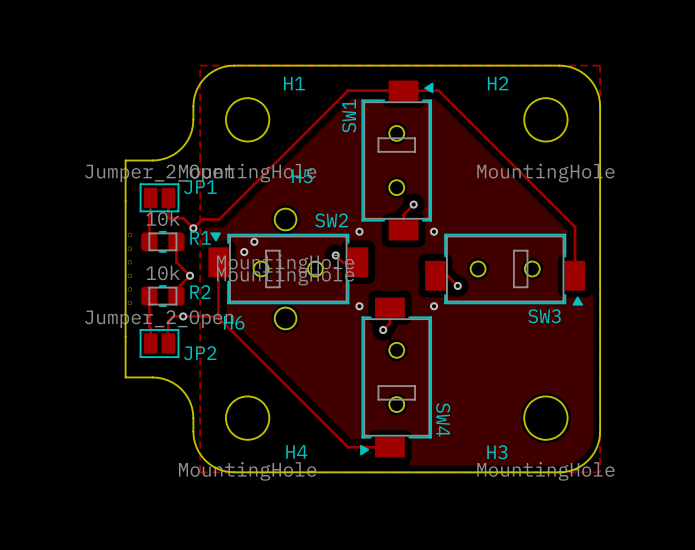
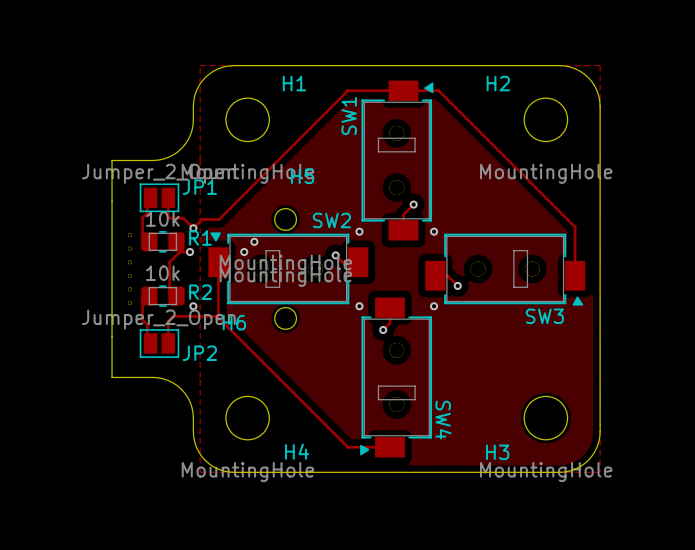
SW1 footprint: [361, 80, 434, 241] -> [361, 80, 434, 241]
board edge: (125, 160) (125, 377) -> (125, 160) (112, 160) (112, 377) (125, 377)
track: none -> (147, 197) (147, 213) (142, 218) (142, 241)
track: (150, 197) (149, 241) -> none
SW2 footprint: [208, 232, 369, 305] -> [208, 232, 369, 305]
SW3 footprint: [425, 233, 586, 306] -> [425, 233, 586, 306]
track: (176, 241) (176, 262) (190, 275) (176, 289) (176, 296) -> none
track: none -> (190, 252) (179, 252) (169, 262) (169, 296)
via: none -> (190, 252)
via: (190, 275) -> none
track: none -> (142, 296) (142, 319) (147, 324) (147, 340)
track: (149, 296) (150, 343) -> none
SW4 footprint: [360, 297, 433, 458] -> [360, 297, 433, 458]
via position: (183, 316) -> (193, 306)

